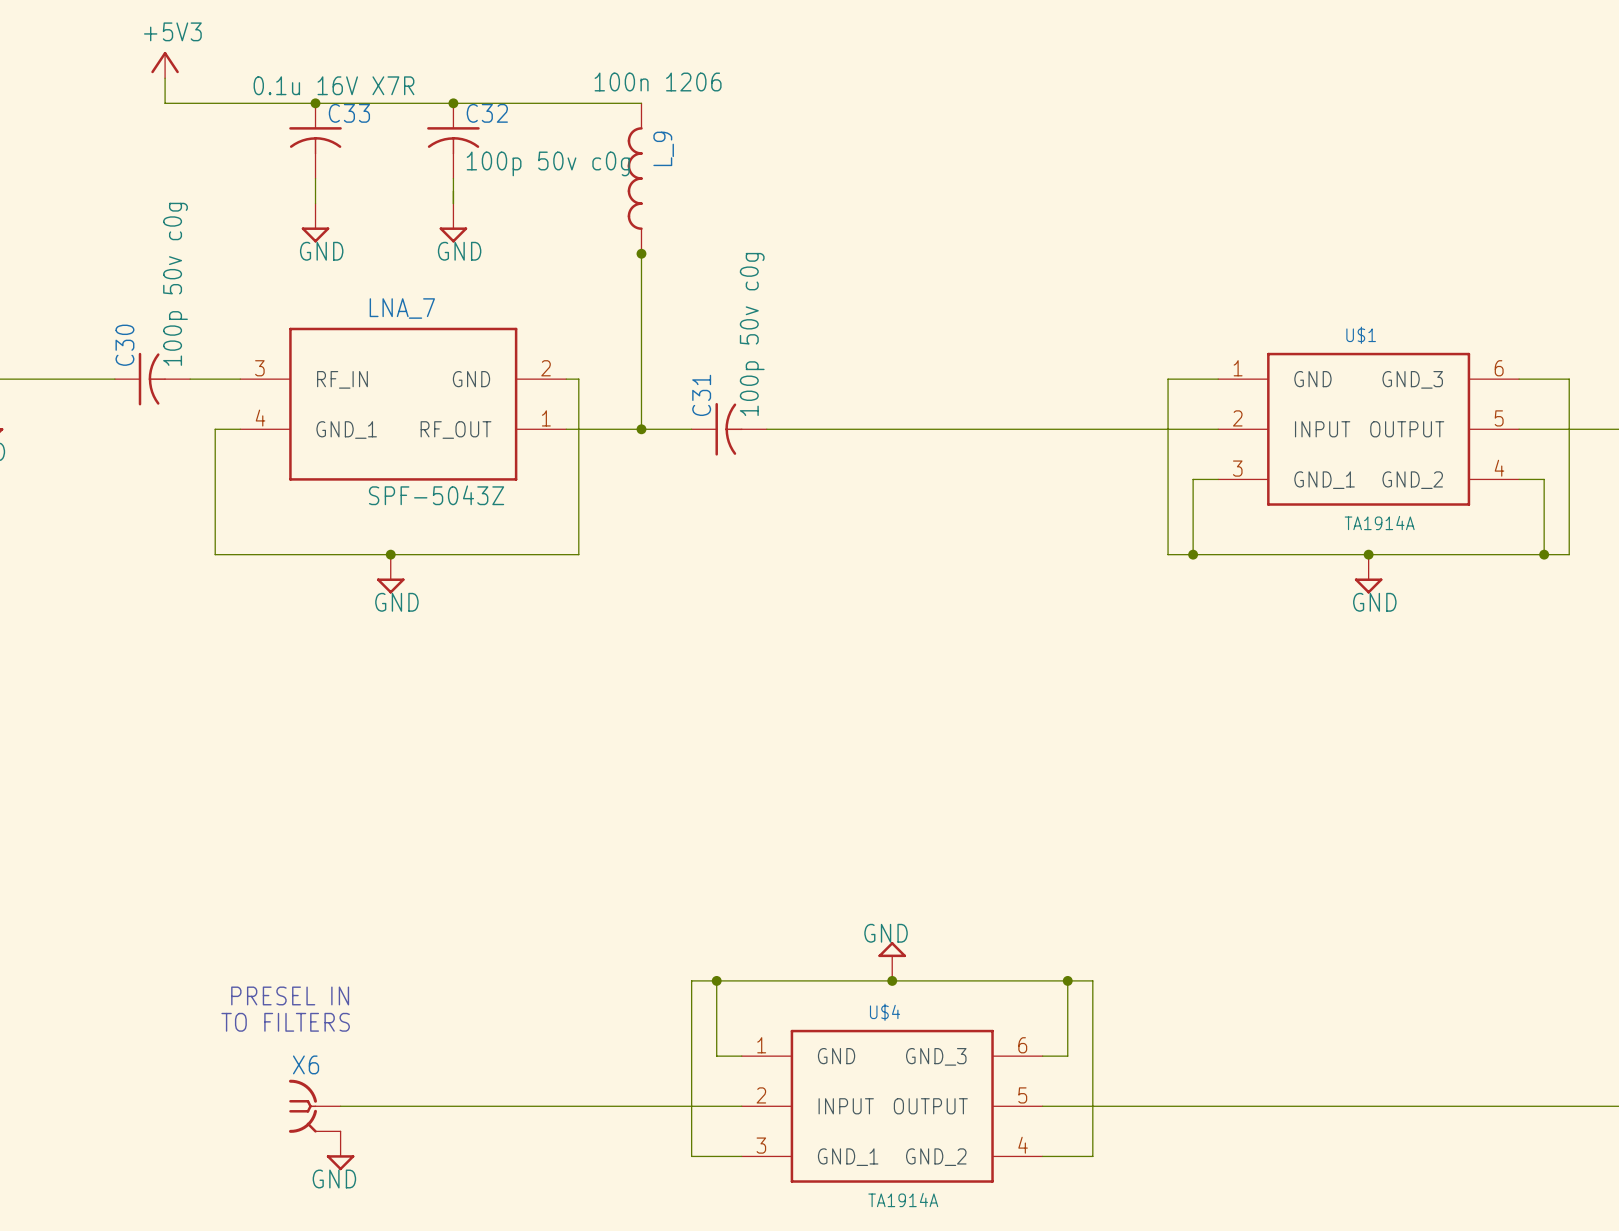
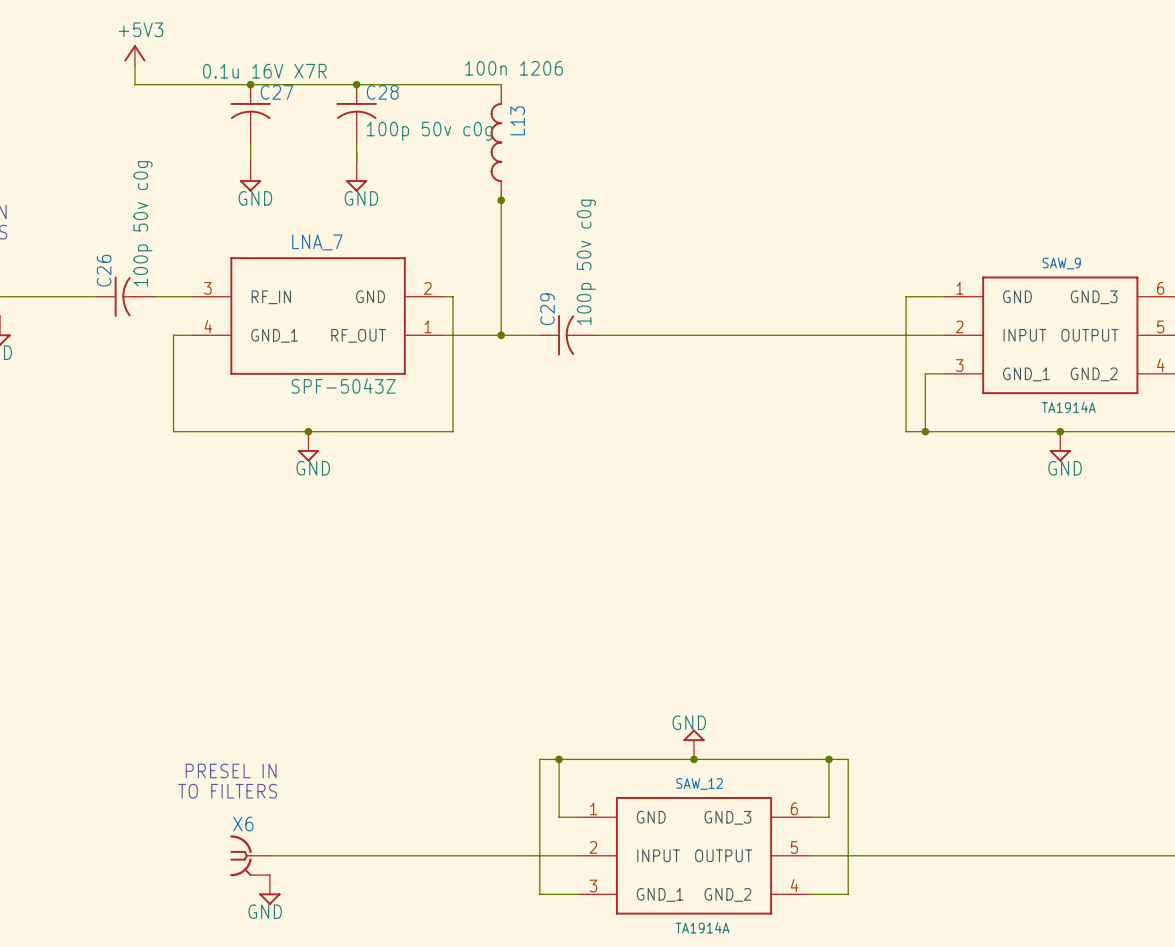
C33 name: C33 (349, 113) -> C27 (276, 92)
C32 name: C32 (487, 113) -> C28 (382, 92)
L_9 name: L_9 (663, 148) -> L13 (517, 120)
U$1 name: U$1 (1361, 335) -> SAW_9 (1061, 263)
C30 name: C30 (124, 345) -> C26 (104, 270)
C31 name: C31 (701, 395) -> C29 (547, 309)
U$4 name: U$4 (885, 1012) -> SAW_12 (699, 783)

